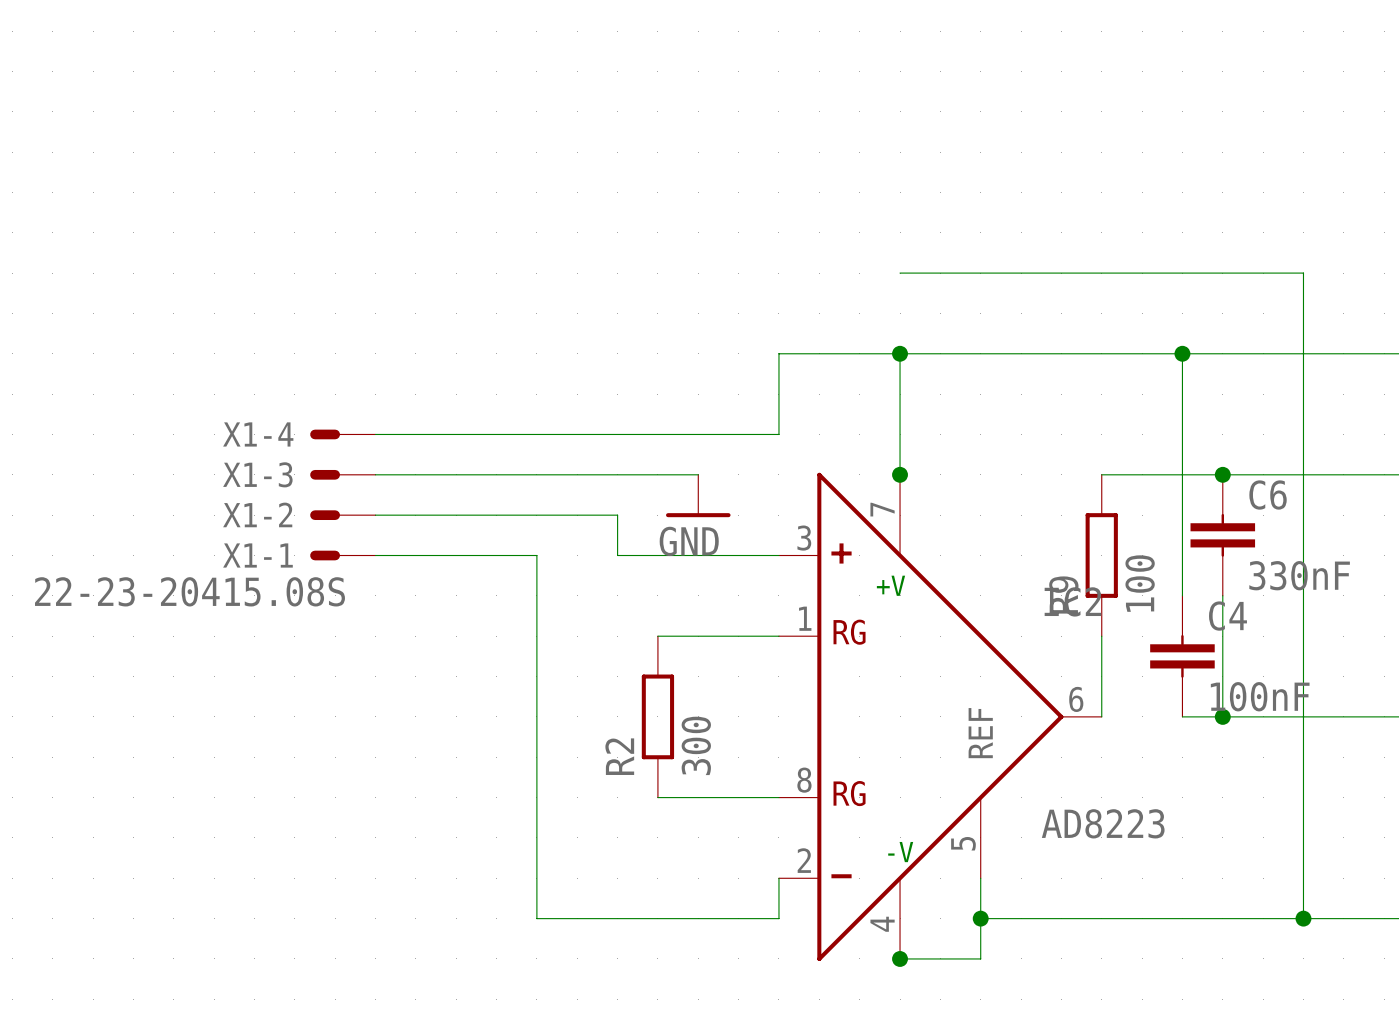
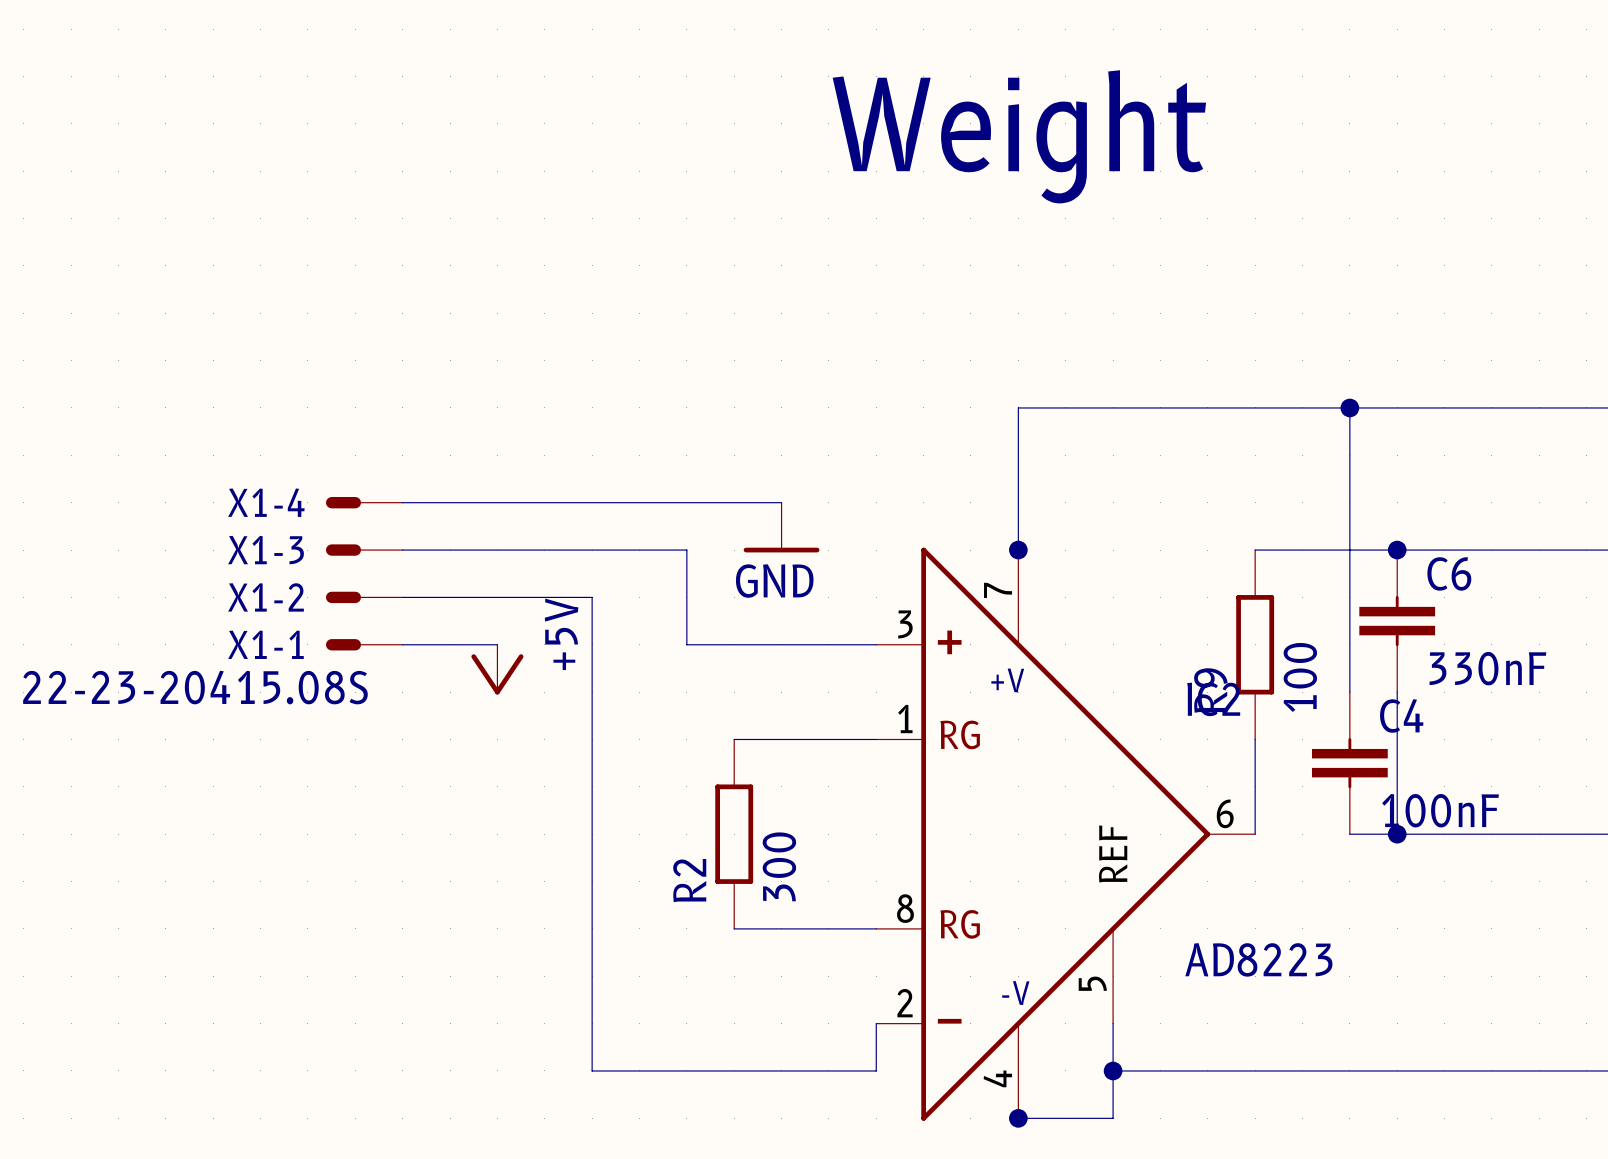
text: none -> Weight (1019, 136)
wire: (900, 273) (1303, 273) (1303, 918) -> none
wire: (900, 353) (778, 353) (778, 434) (698, 434) -> none
junction: (900, 353) -> none
wire: (617, 474) (698, 474) -> (686, 550) (686, 597)
power symbol position: GND (698, 495) -> GND (781, 527)
wire: (536, 515) (617, 515) -> (592, 597) (592, 644)
wire: (456, 555) (536, 555) -> none
power symbol: none -> +5V (497, 669)
junction: (1303, 918) -> none

